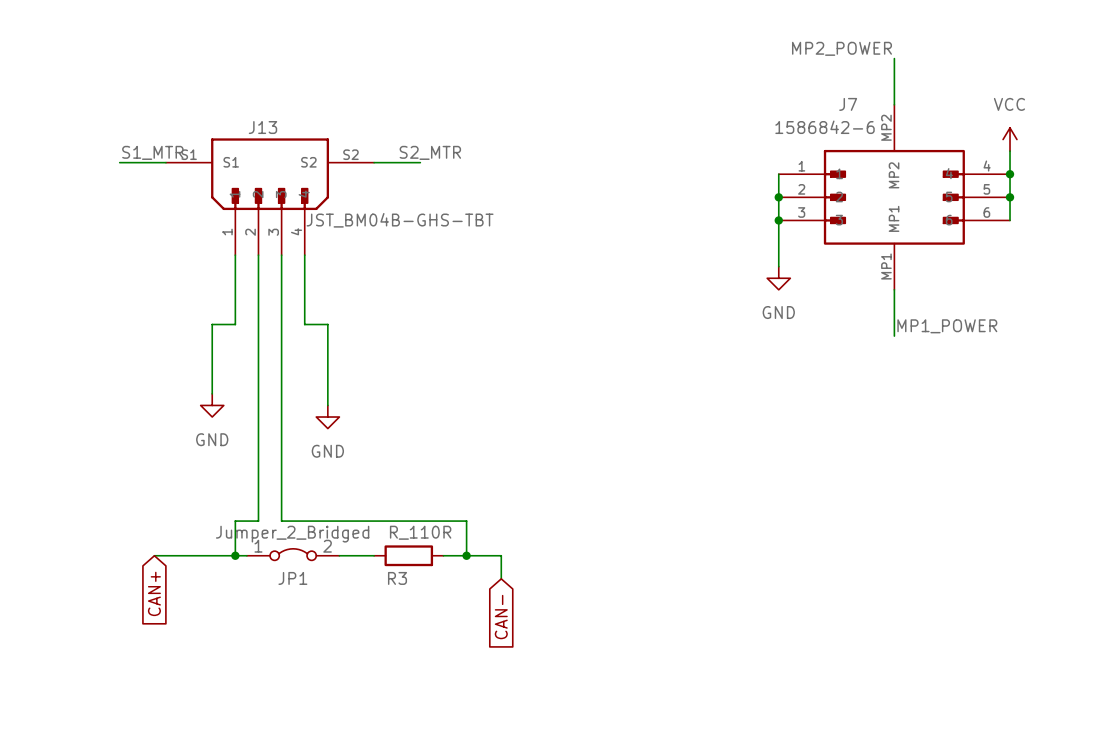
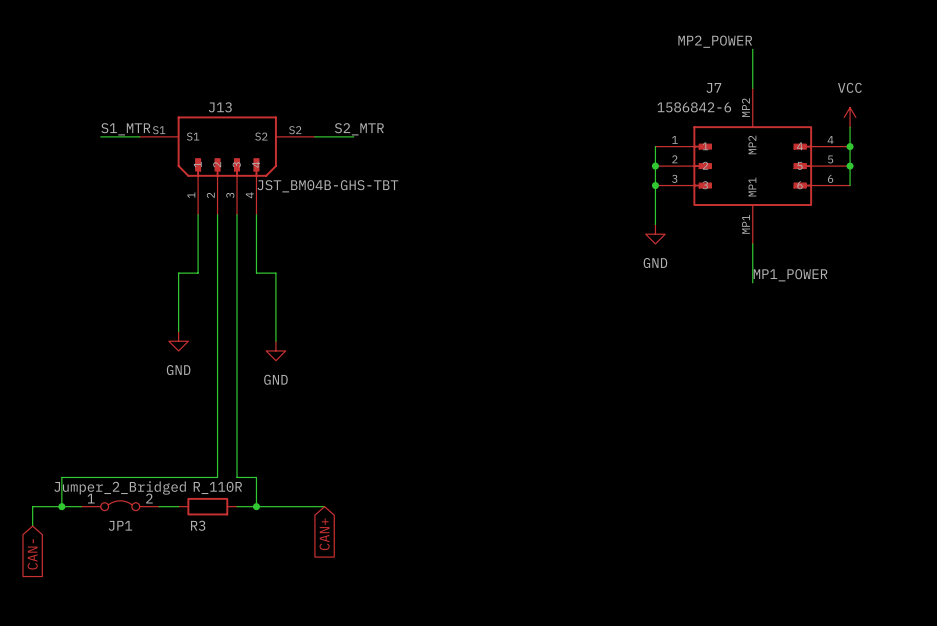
wire: (258, 521) (235, 521) (235, 555) -> (217, 438) (217, 477) (61, 477) (61, 506)
wire: (281, 521) (466, 521) (466, 555) -> (237, 438) (237, 477) (256, 477) (256, 506)
JP1 position: (293, 554) -> (120, 505)
wire: (154, 555) (246, 555) -> none
junction: (235, 555) -> none
wire: (339, 555) (374, 555) -> none
R3 position: (408, 555) -> (207, 506)
wire: (443, 555) (501, 555) (501, 578) -> none
junction: (466, 555) -> none
global label: CAN+ (154, 593) -> none
junction: none -> (61, 506)
wire: none -> (81, 506) (32, 506) (32, 526)
wire: none -> (159, 506) (178, 506)
wire: none -> (237, 506) (324, 506)
junction: none -> (256, 506)
global label: CAN- (501, 617) -> none
global label: none -> CAN+ (324, 534)
global label: none -> CAN- (32, 554)

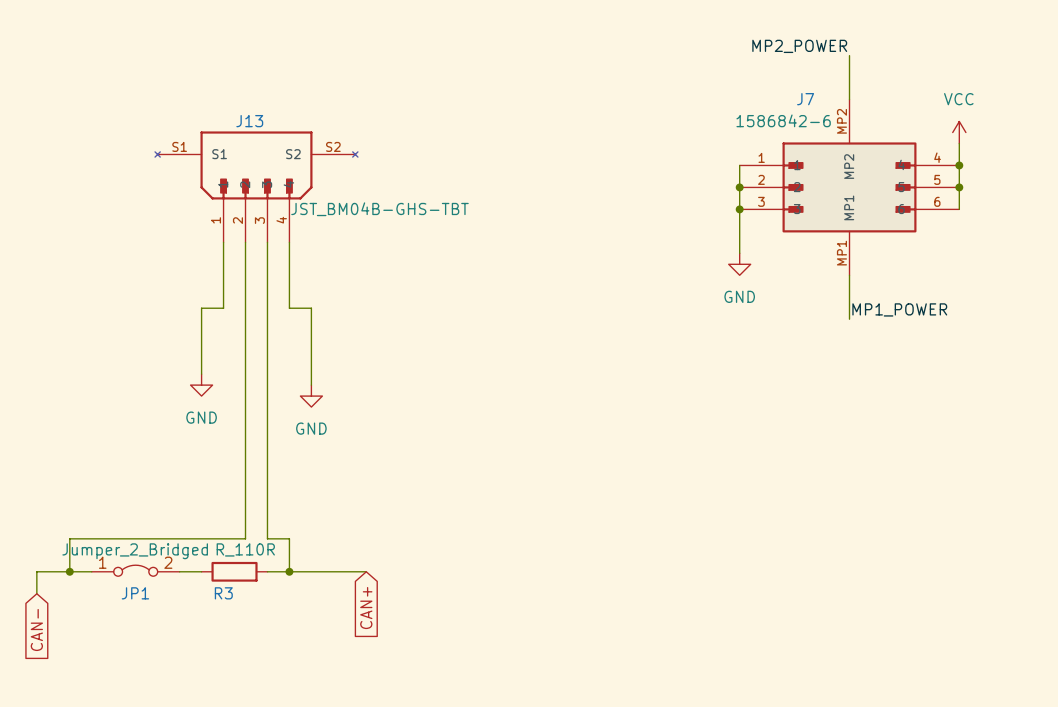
J13 symbol: [139, 116, 315, 215] -> [155, 131, 358, 243]
label: S1_MTR (125, 129) -> none
label: S2_MTR (359, 129) -> none
wire: (100, 136) (139, 136) -> none
wire: (314, 136) (353, 136) -> none

